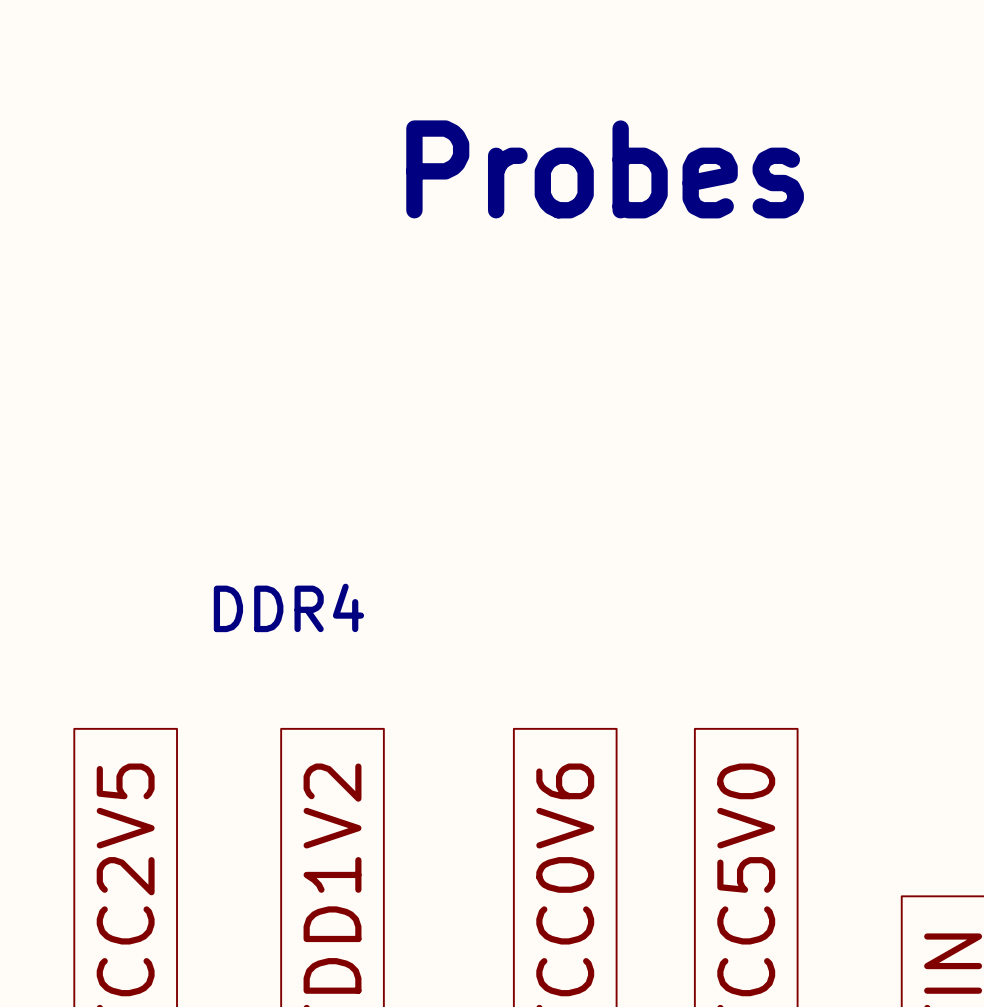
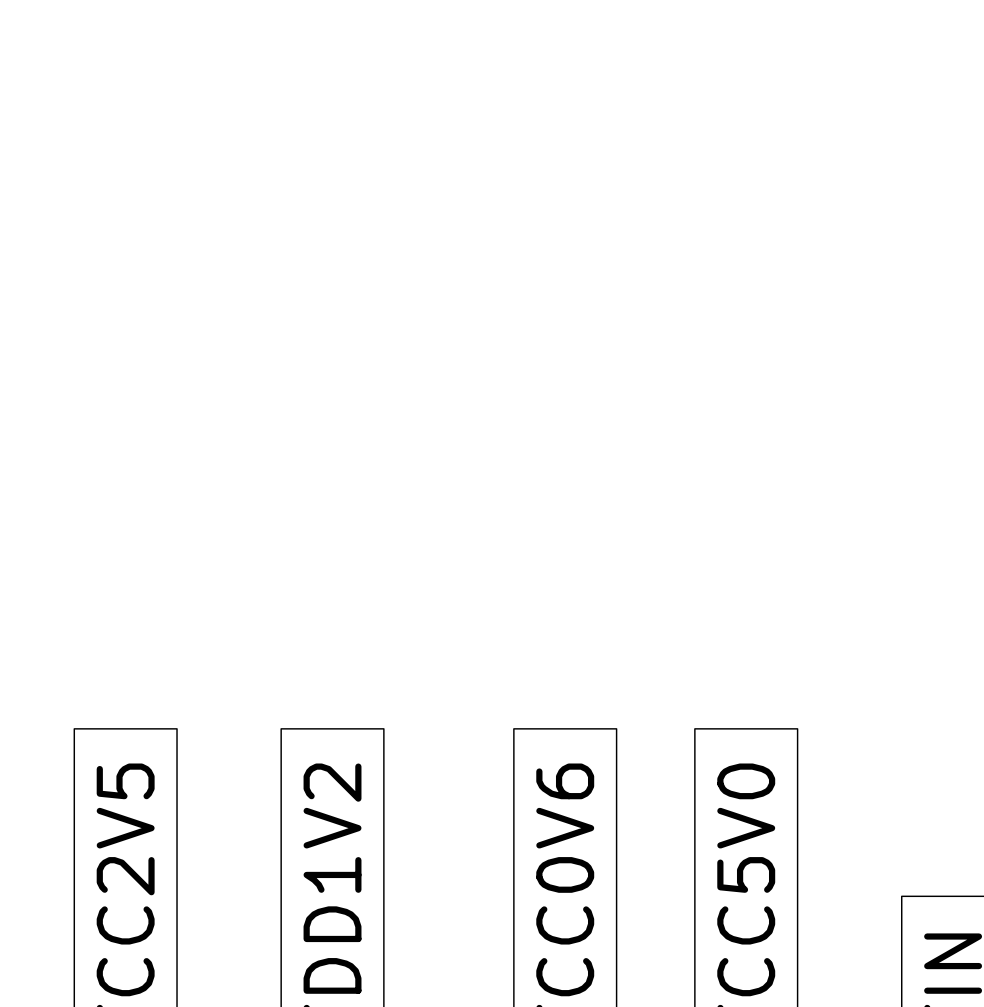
text: Probes (605, 169) -> none
text: DDR4 (288, 607) -> none

